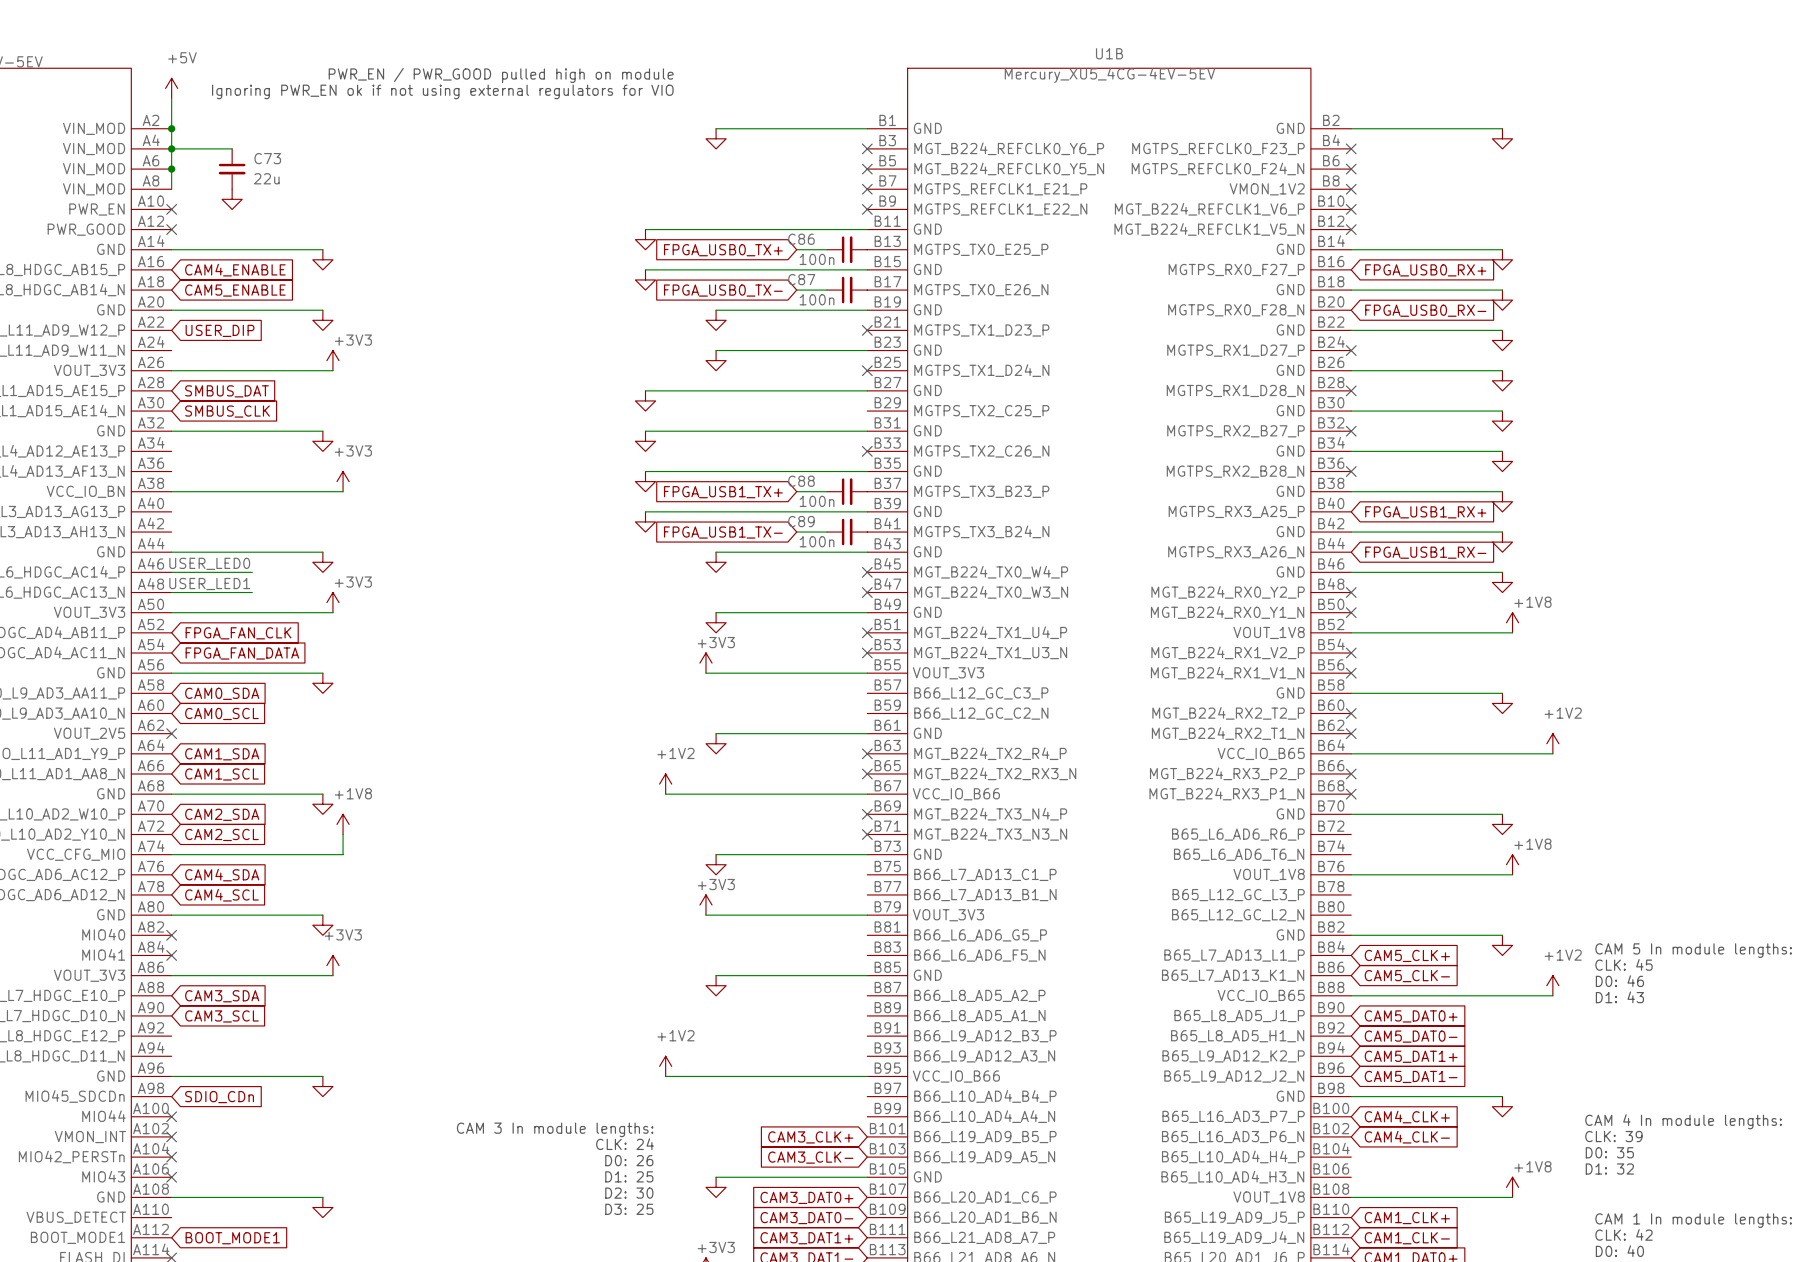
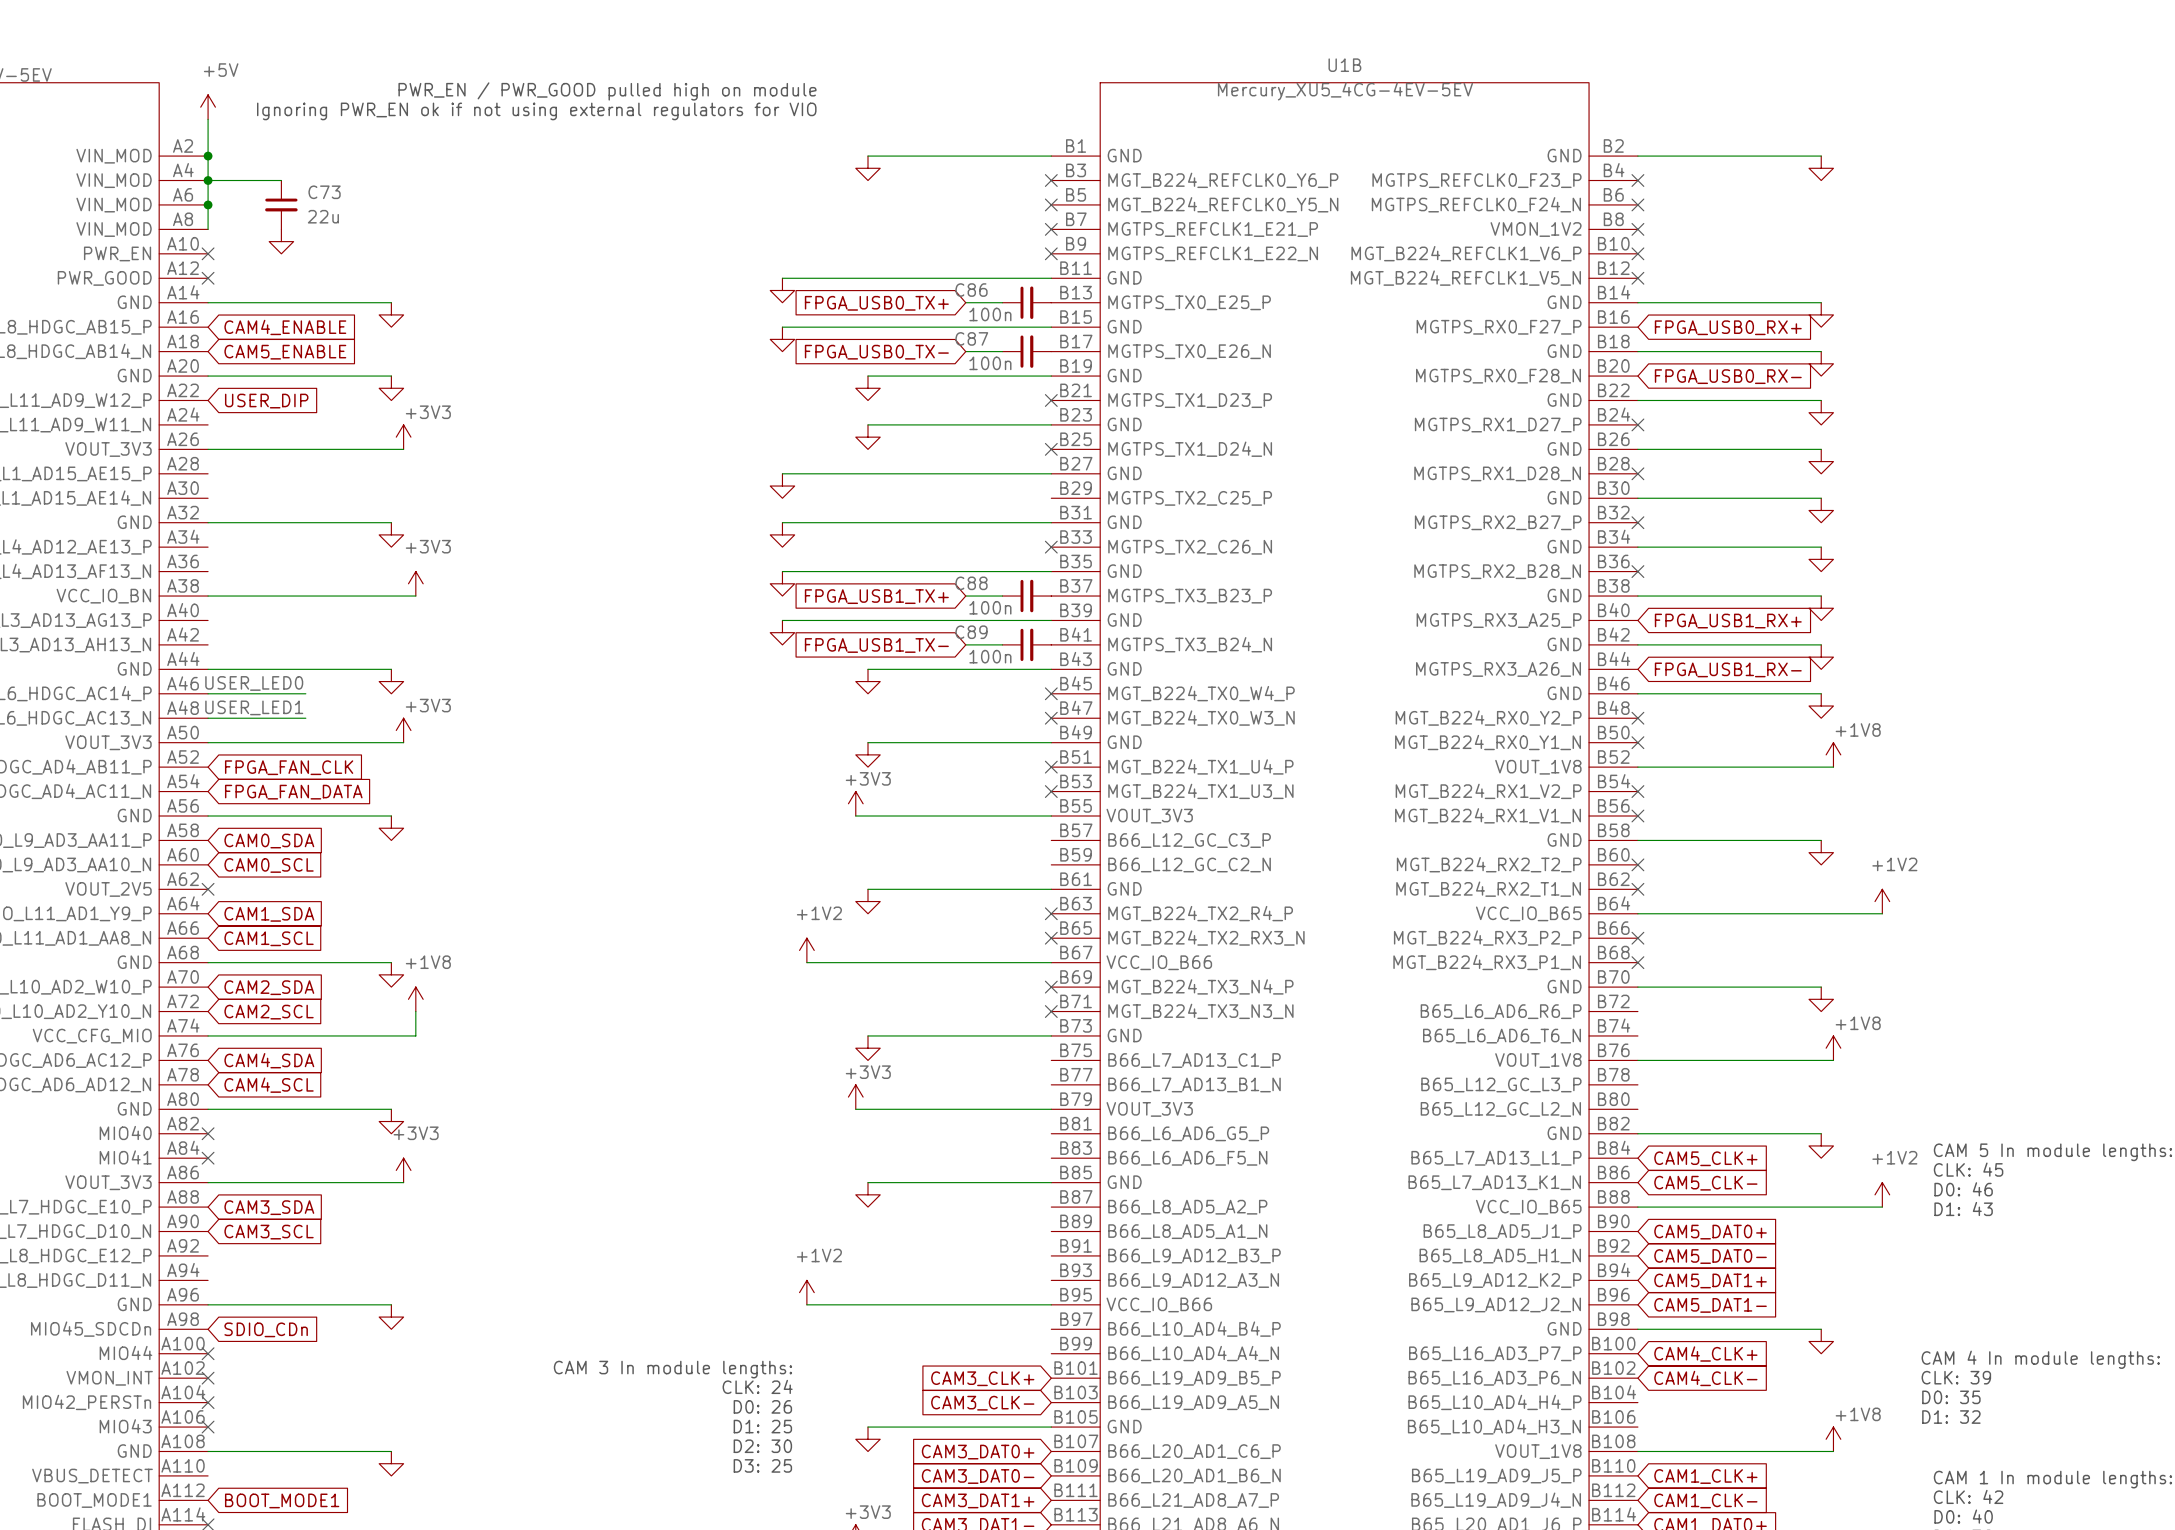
global label: SMBUS_DAT (226, 391) -> none
global label: SMBUS_CLK (227, 411) -> none

